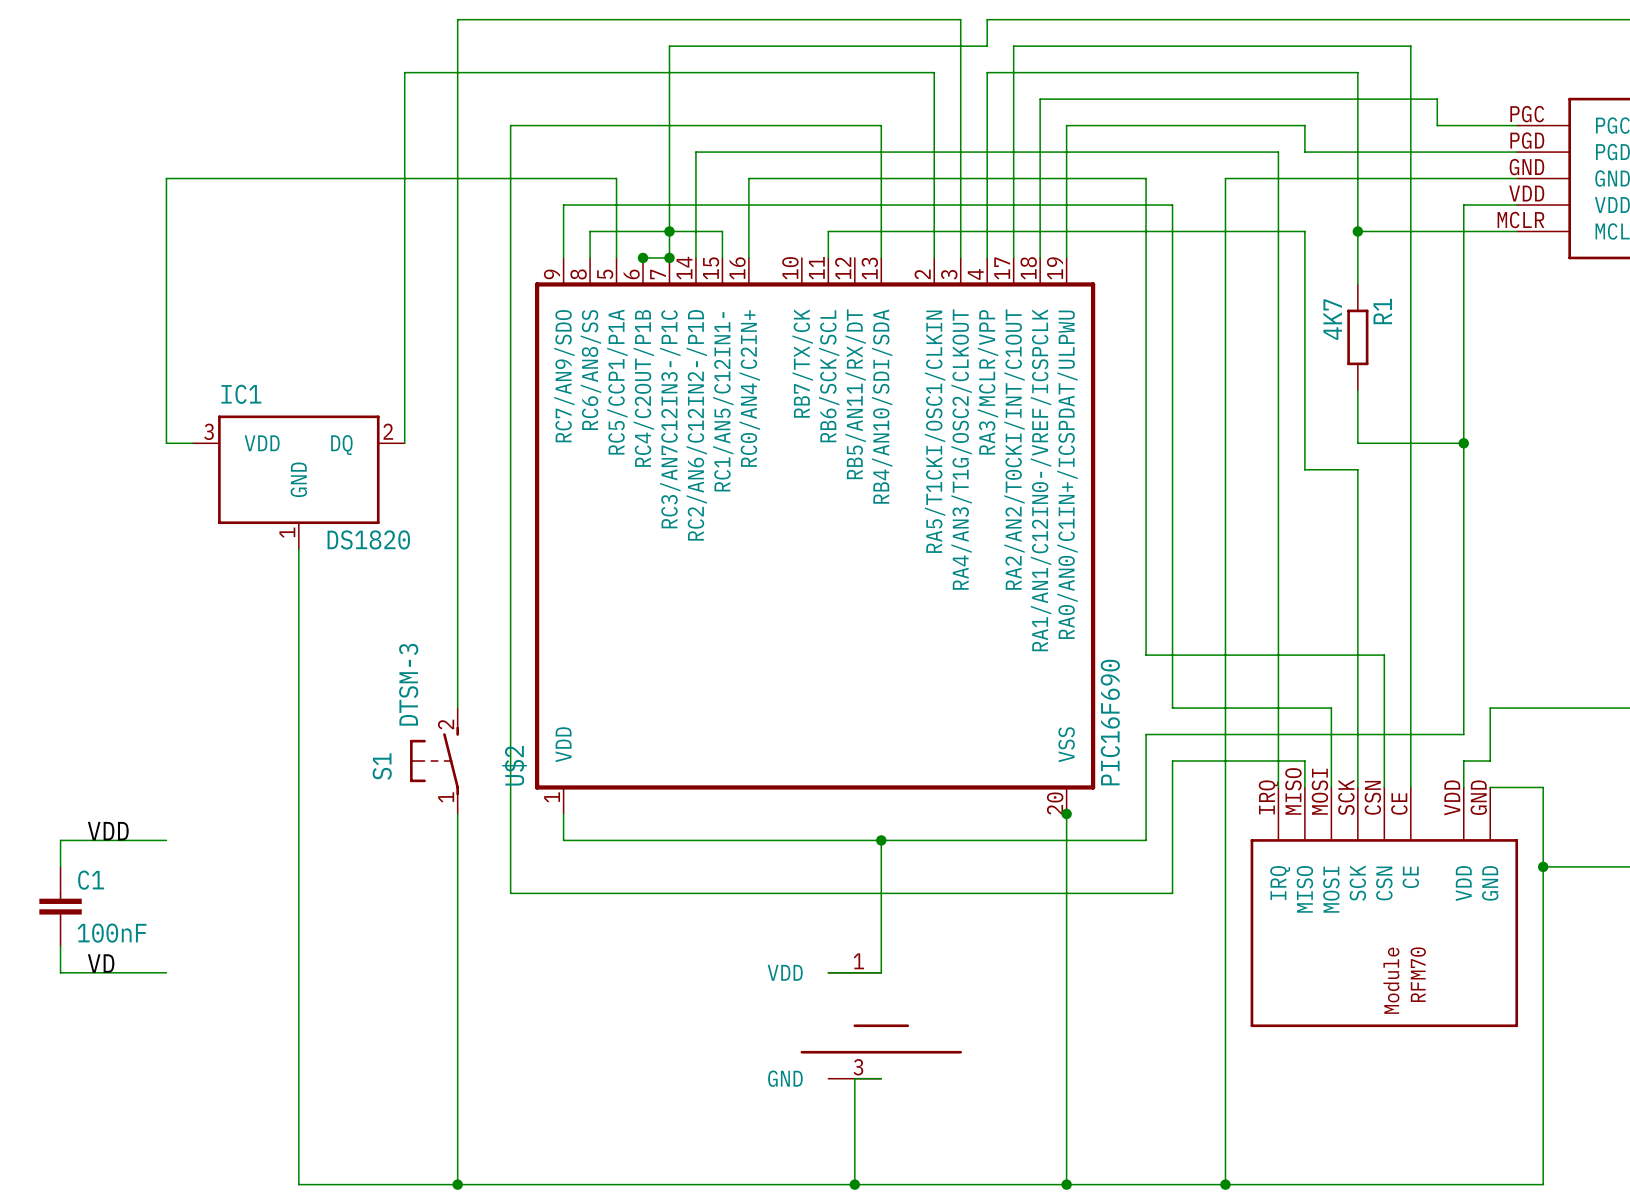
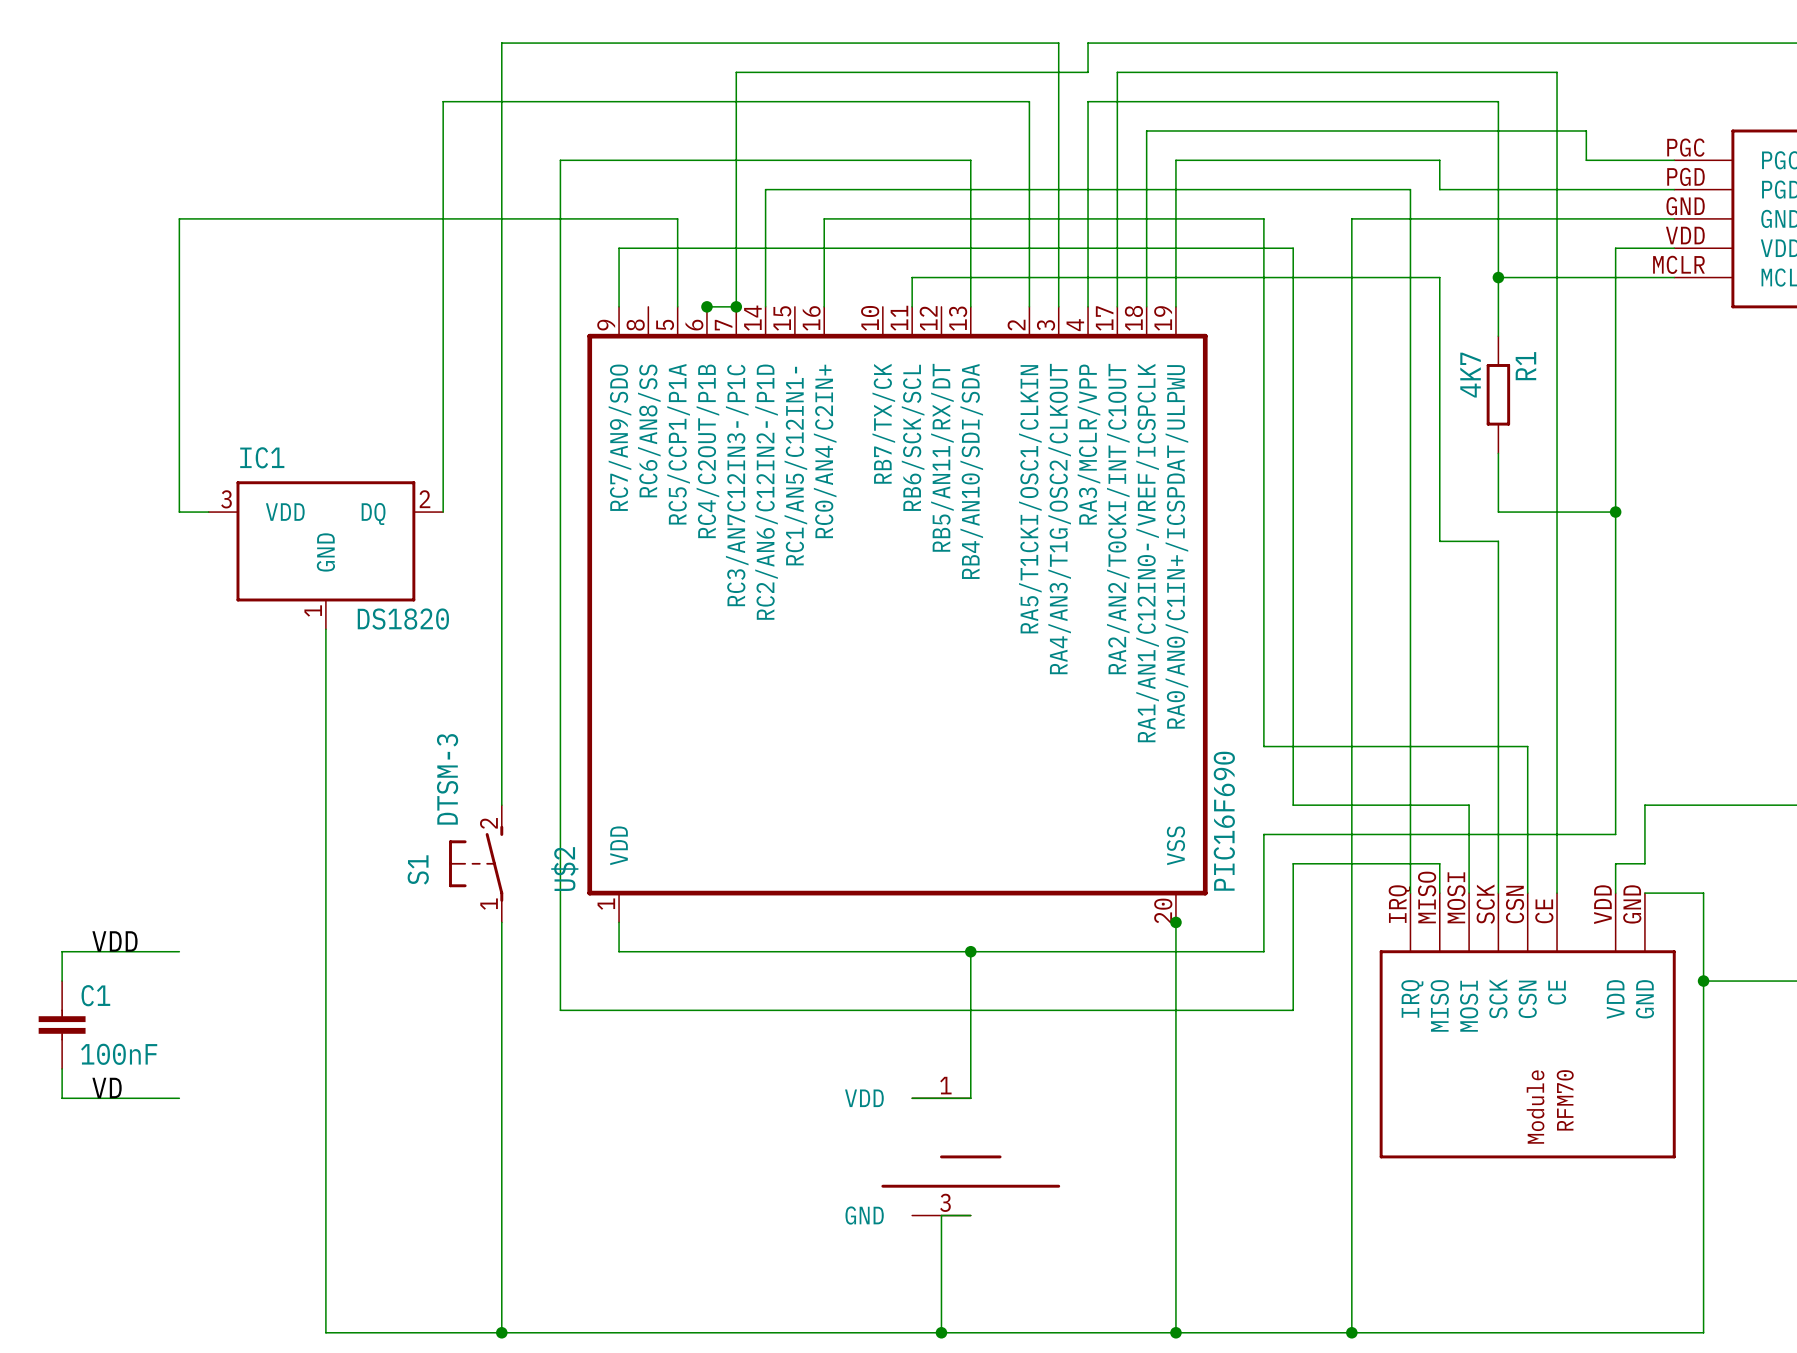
junction: (669, 231) -> none
wire: (590, 257) (590, 231) (722, 231) (722, 257) -> none

